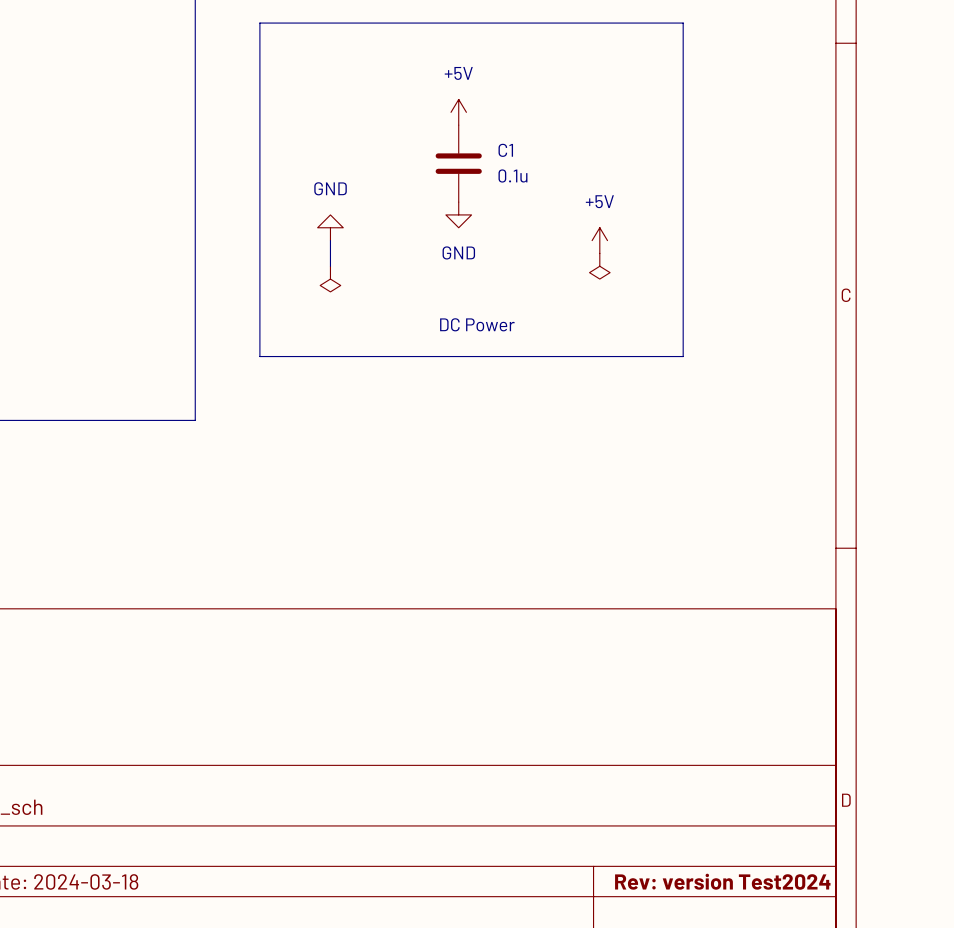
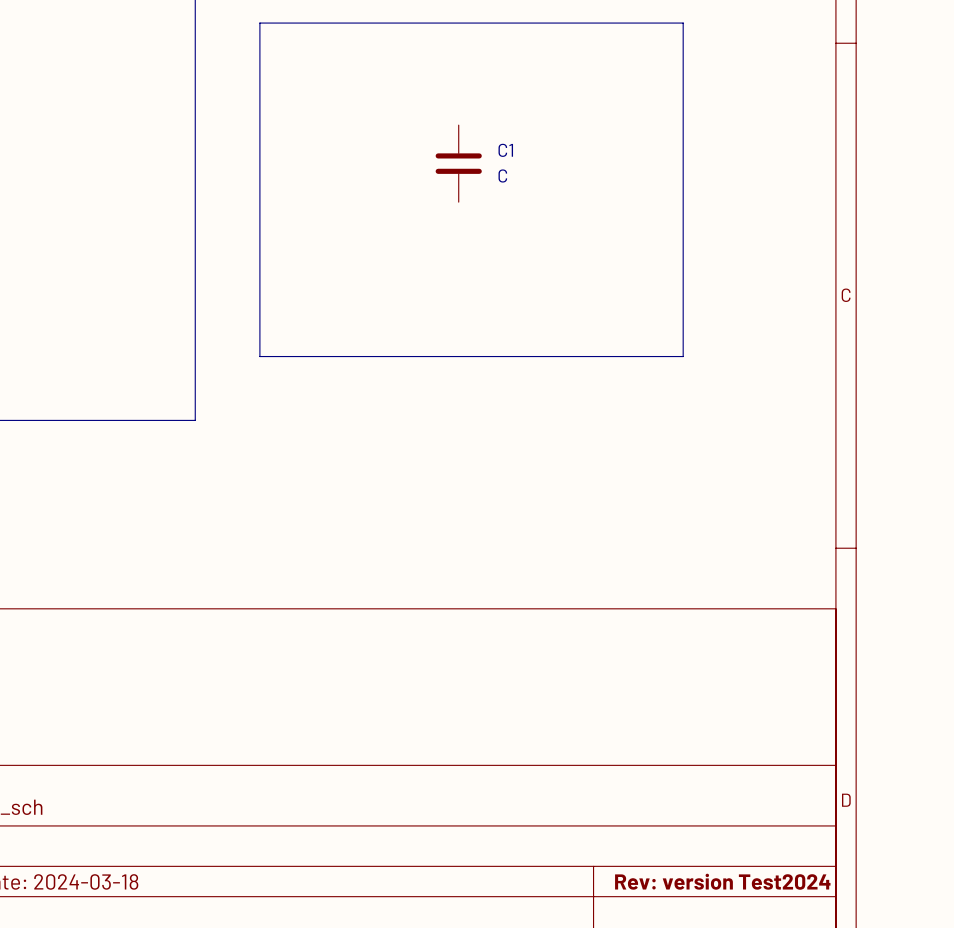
power symbol: +5V (458, 112) -> none
C1 value: 0.1u (512, 175) -> C (502, 175)
power symbol: GND (458, 214) -> none
power symbol: GND (330, 227) -> none
wire: (330, 240) (330, 266) -> none
power symbol: +5V (599, 240) -> none
power symbol: (599, 266) -> none
power symbol: (330, 279) -> none
text: DC Power (477, 324) -> none

